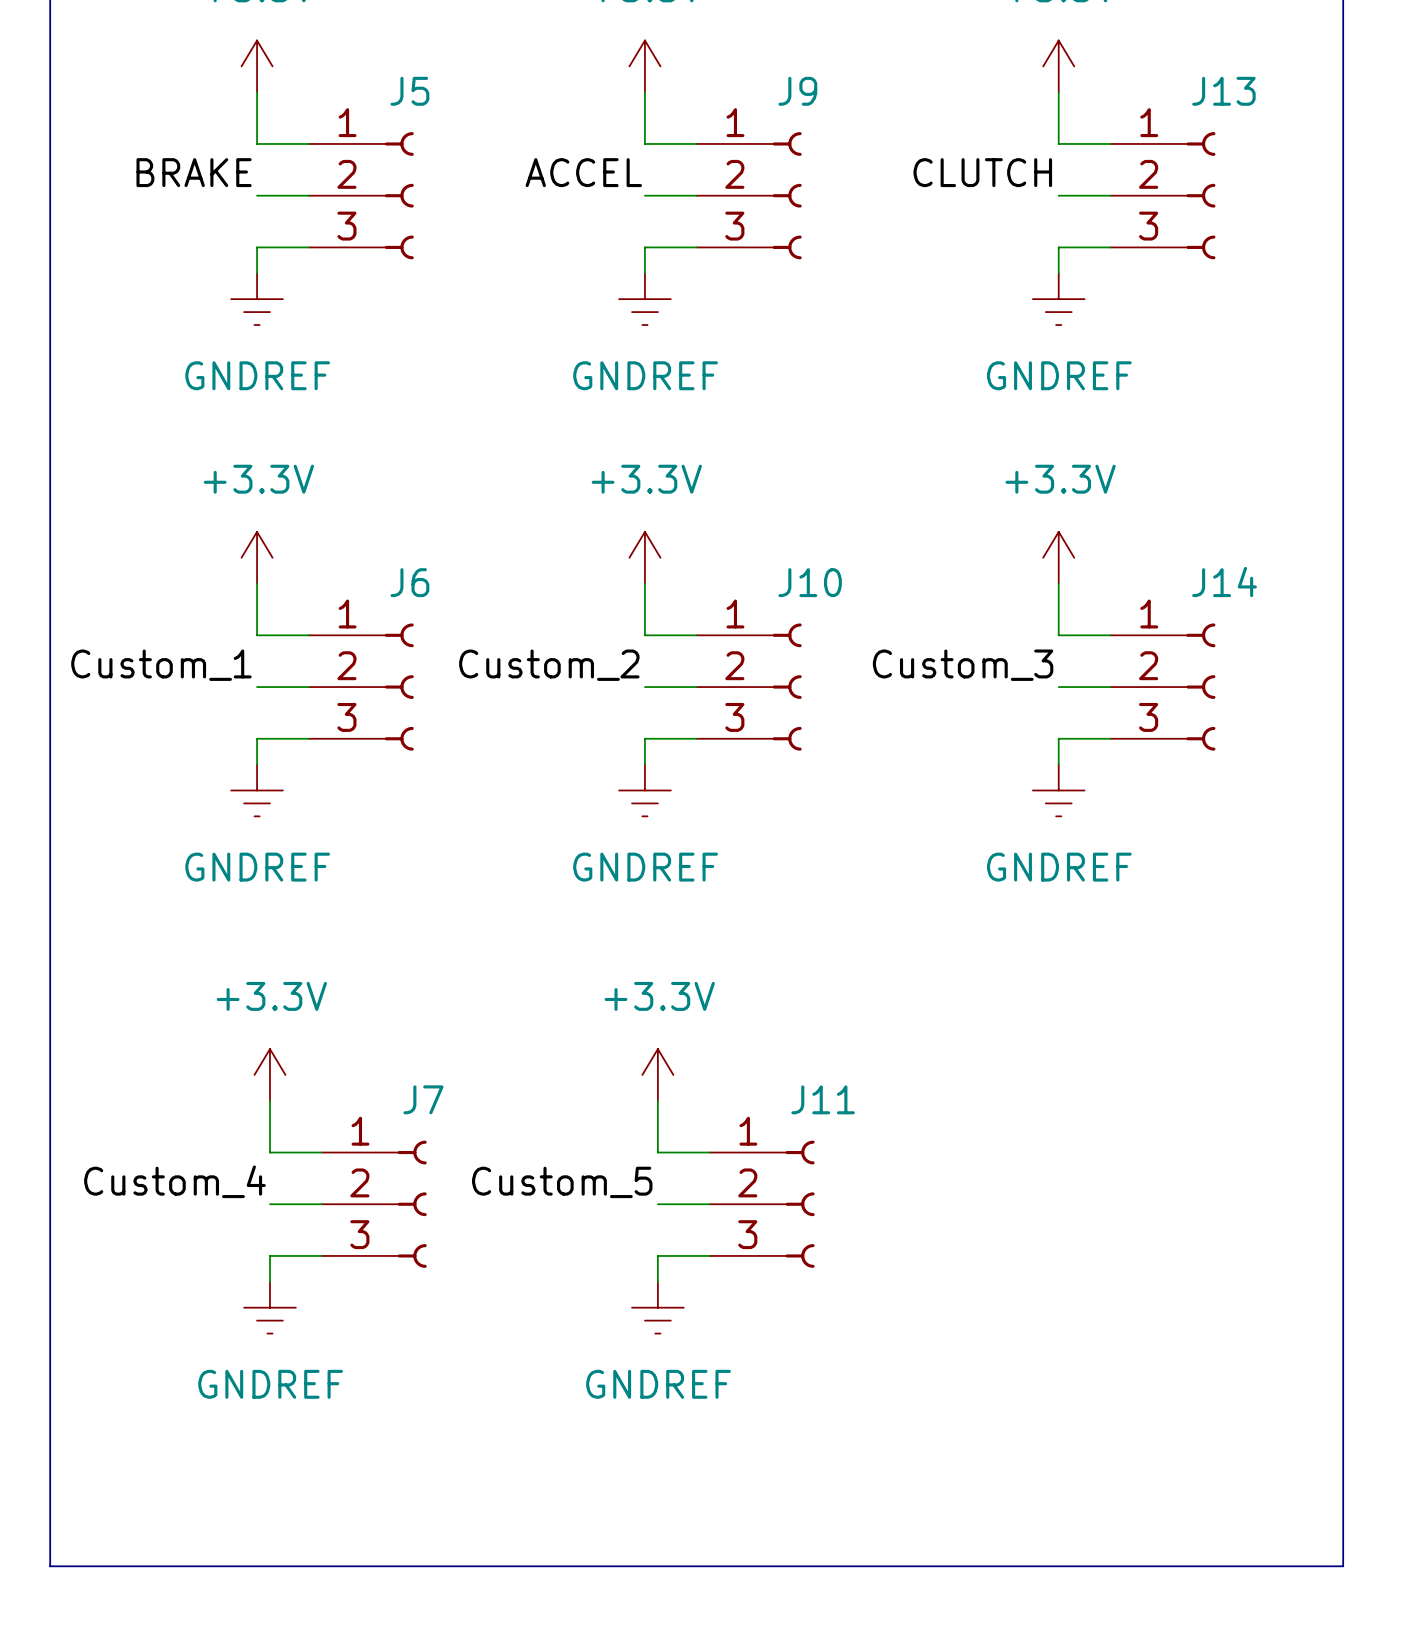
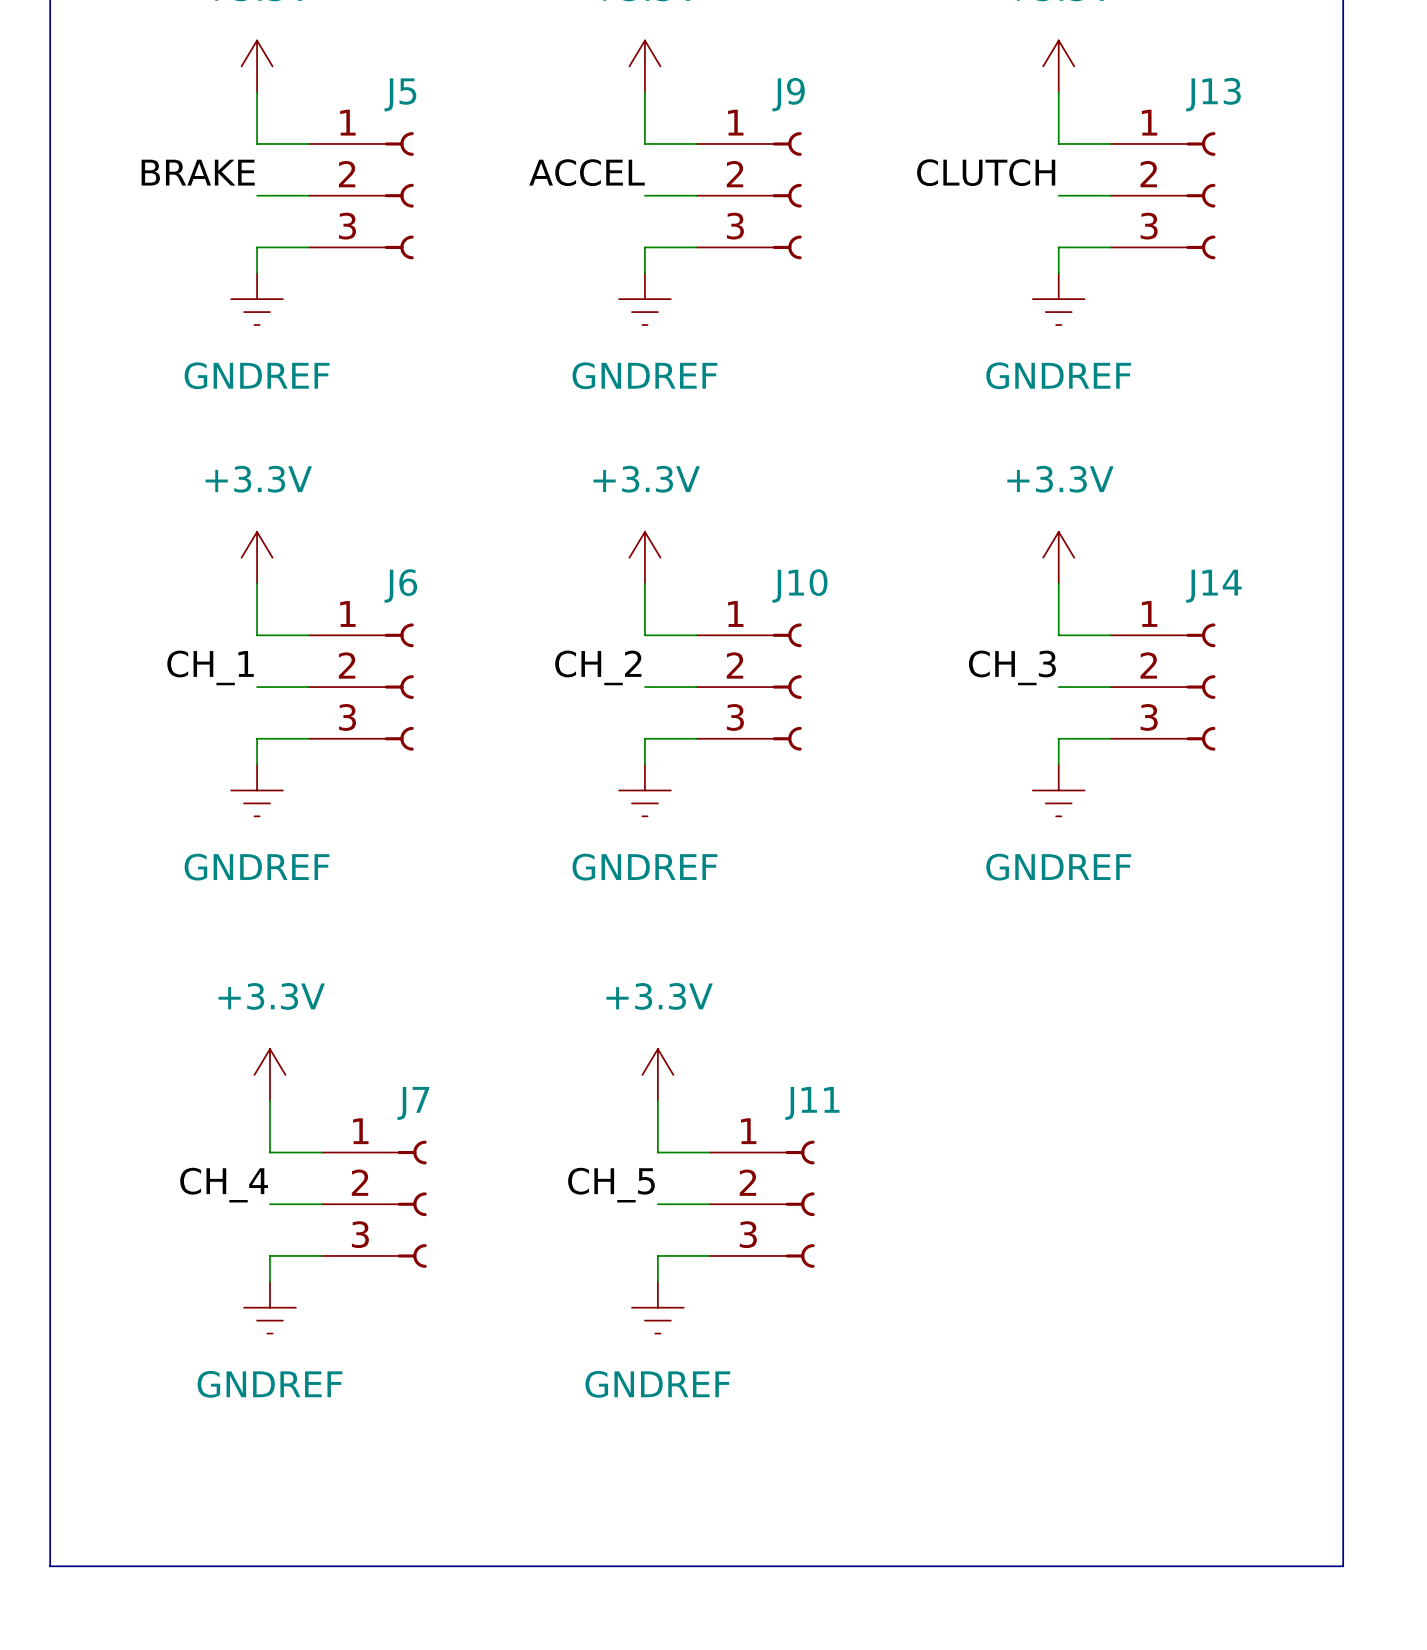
label: Custom_1 (161, 665) -> CH_1 (210, 667)
label: Custom_2 (549, 665) -> CH_2 (598, 667)
label: Custom_3 (963, 665) -> CH_3 (1012, 667)
label: Custom_4 (174, 1181) -> CH_4 (224, 1185)
label: Custom_5 (562, 1182) -> CH_5 (611, 1185)

